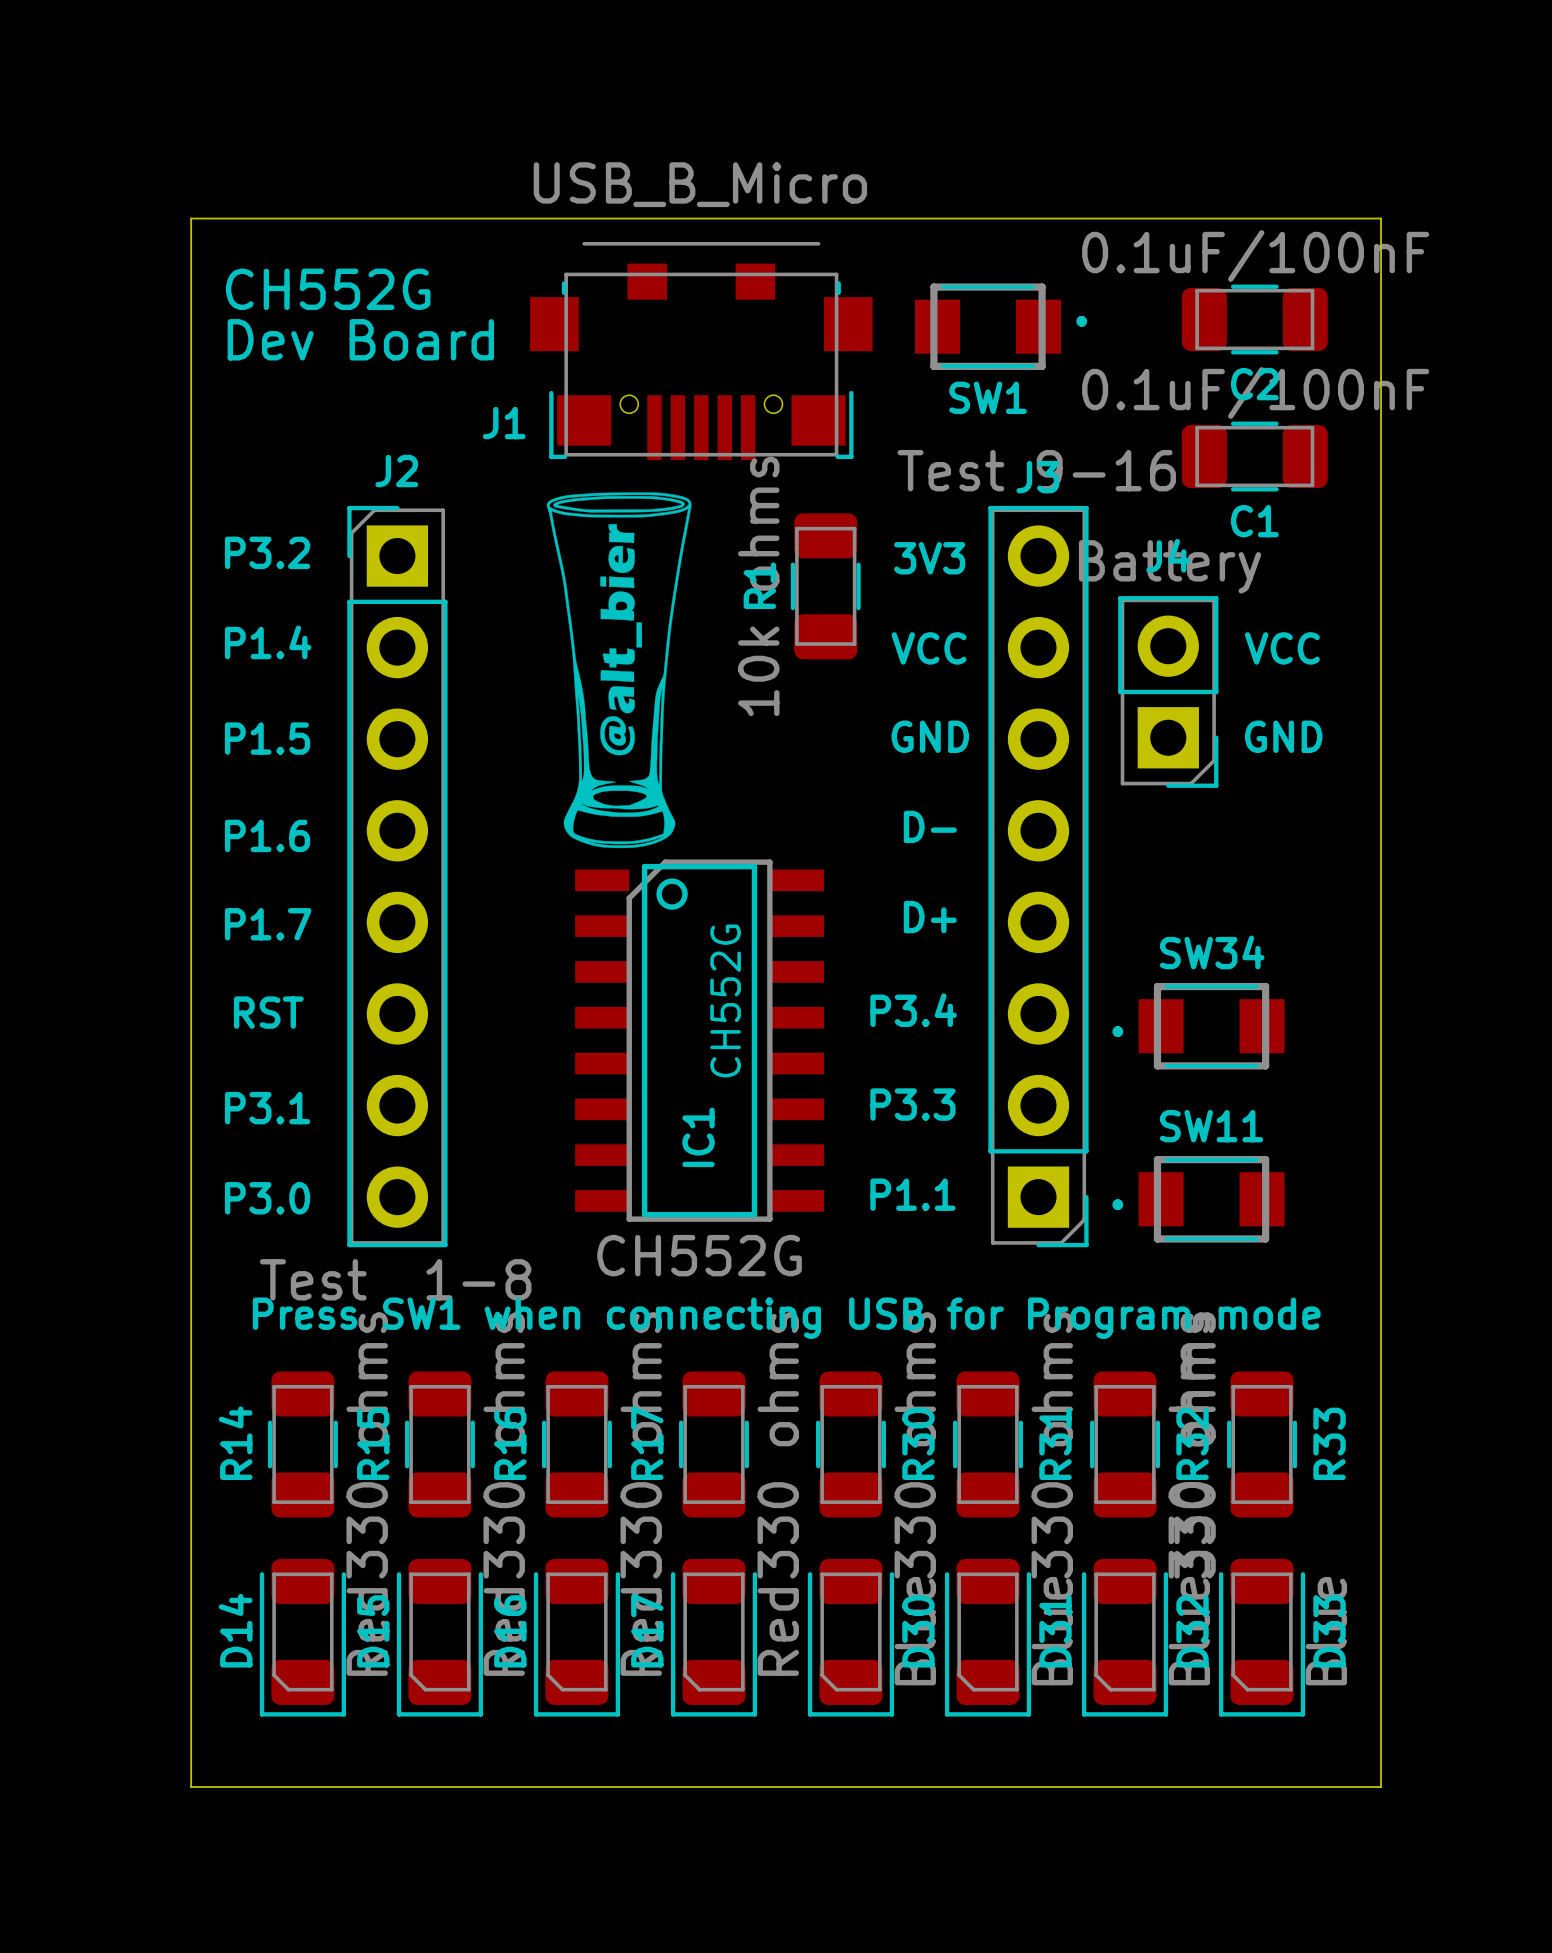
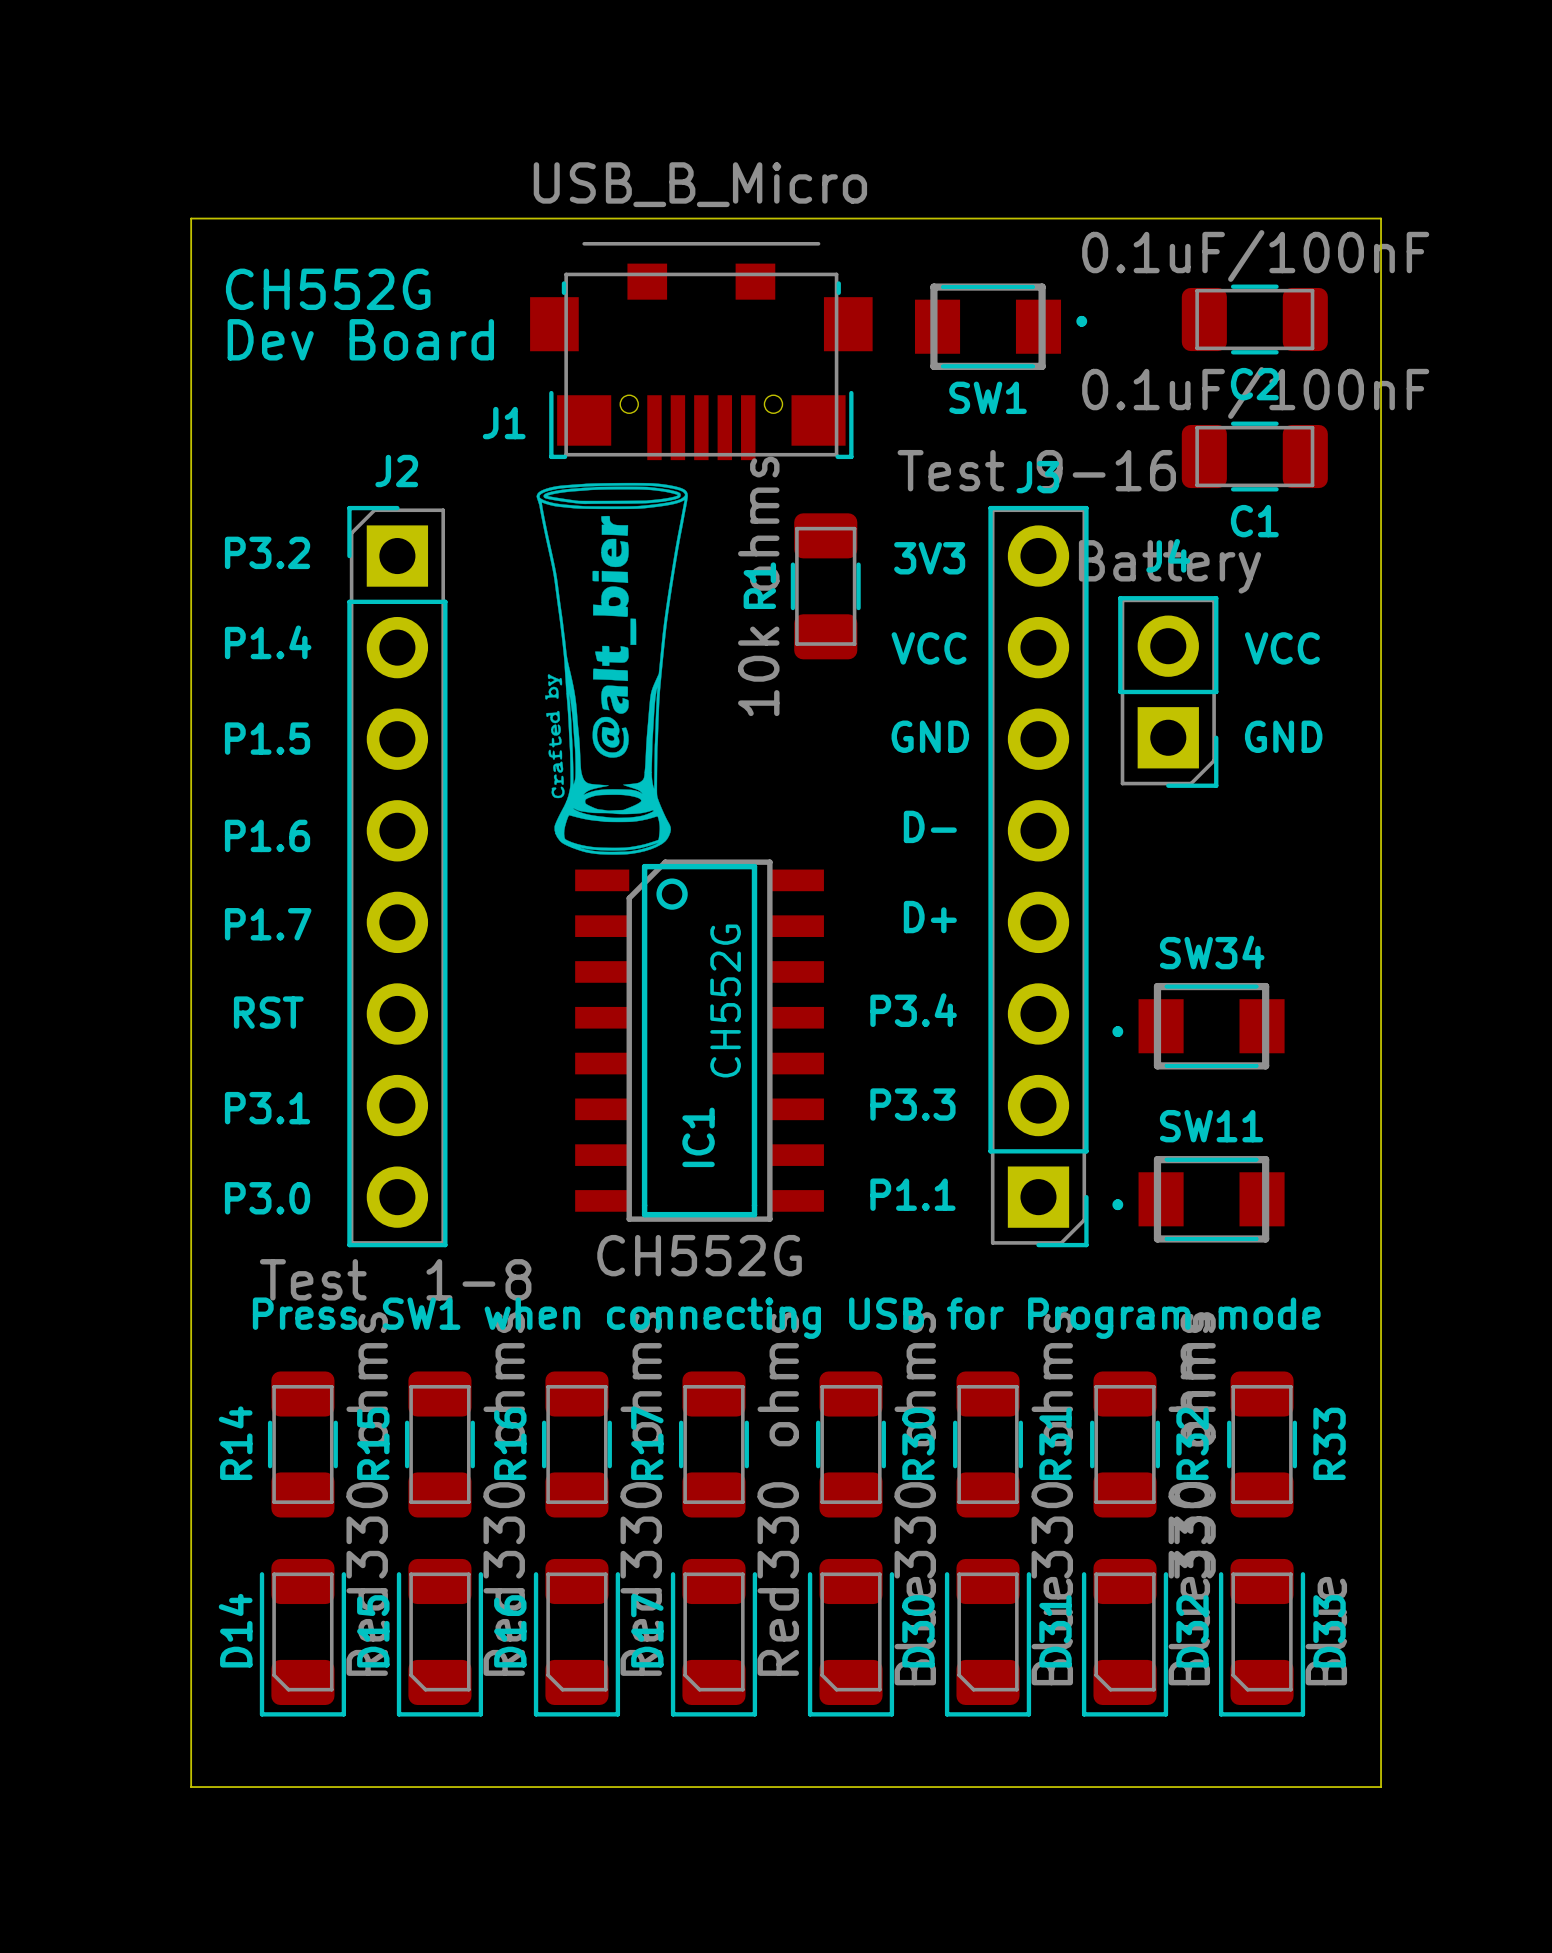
drawing shape: [546, 492, 692, 849] -> [536, 482, 688, 855]

